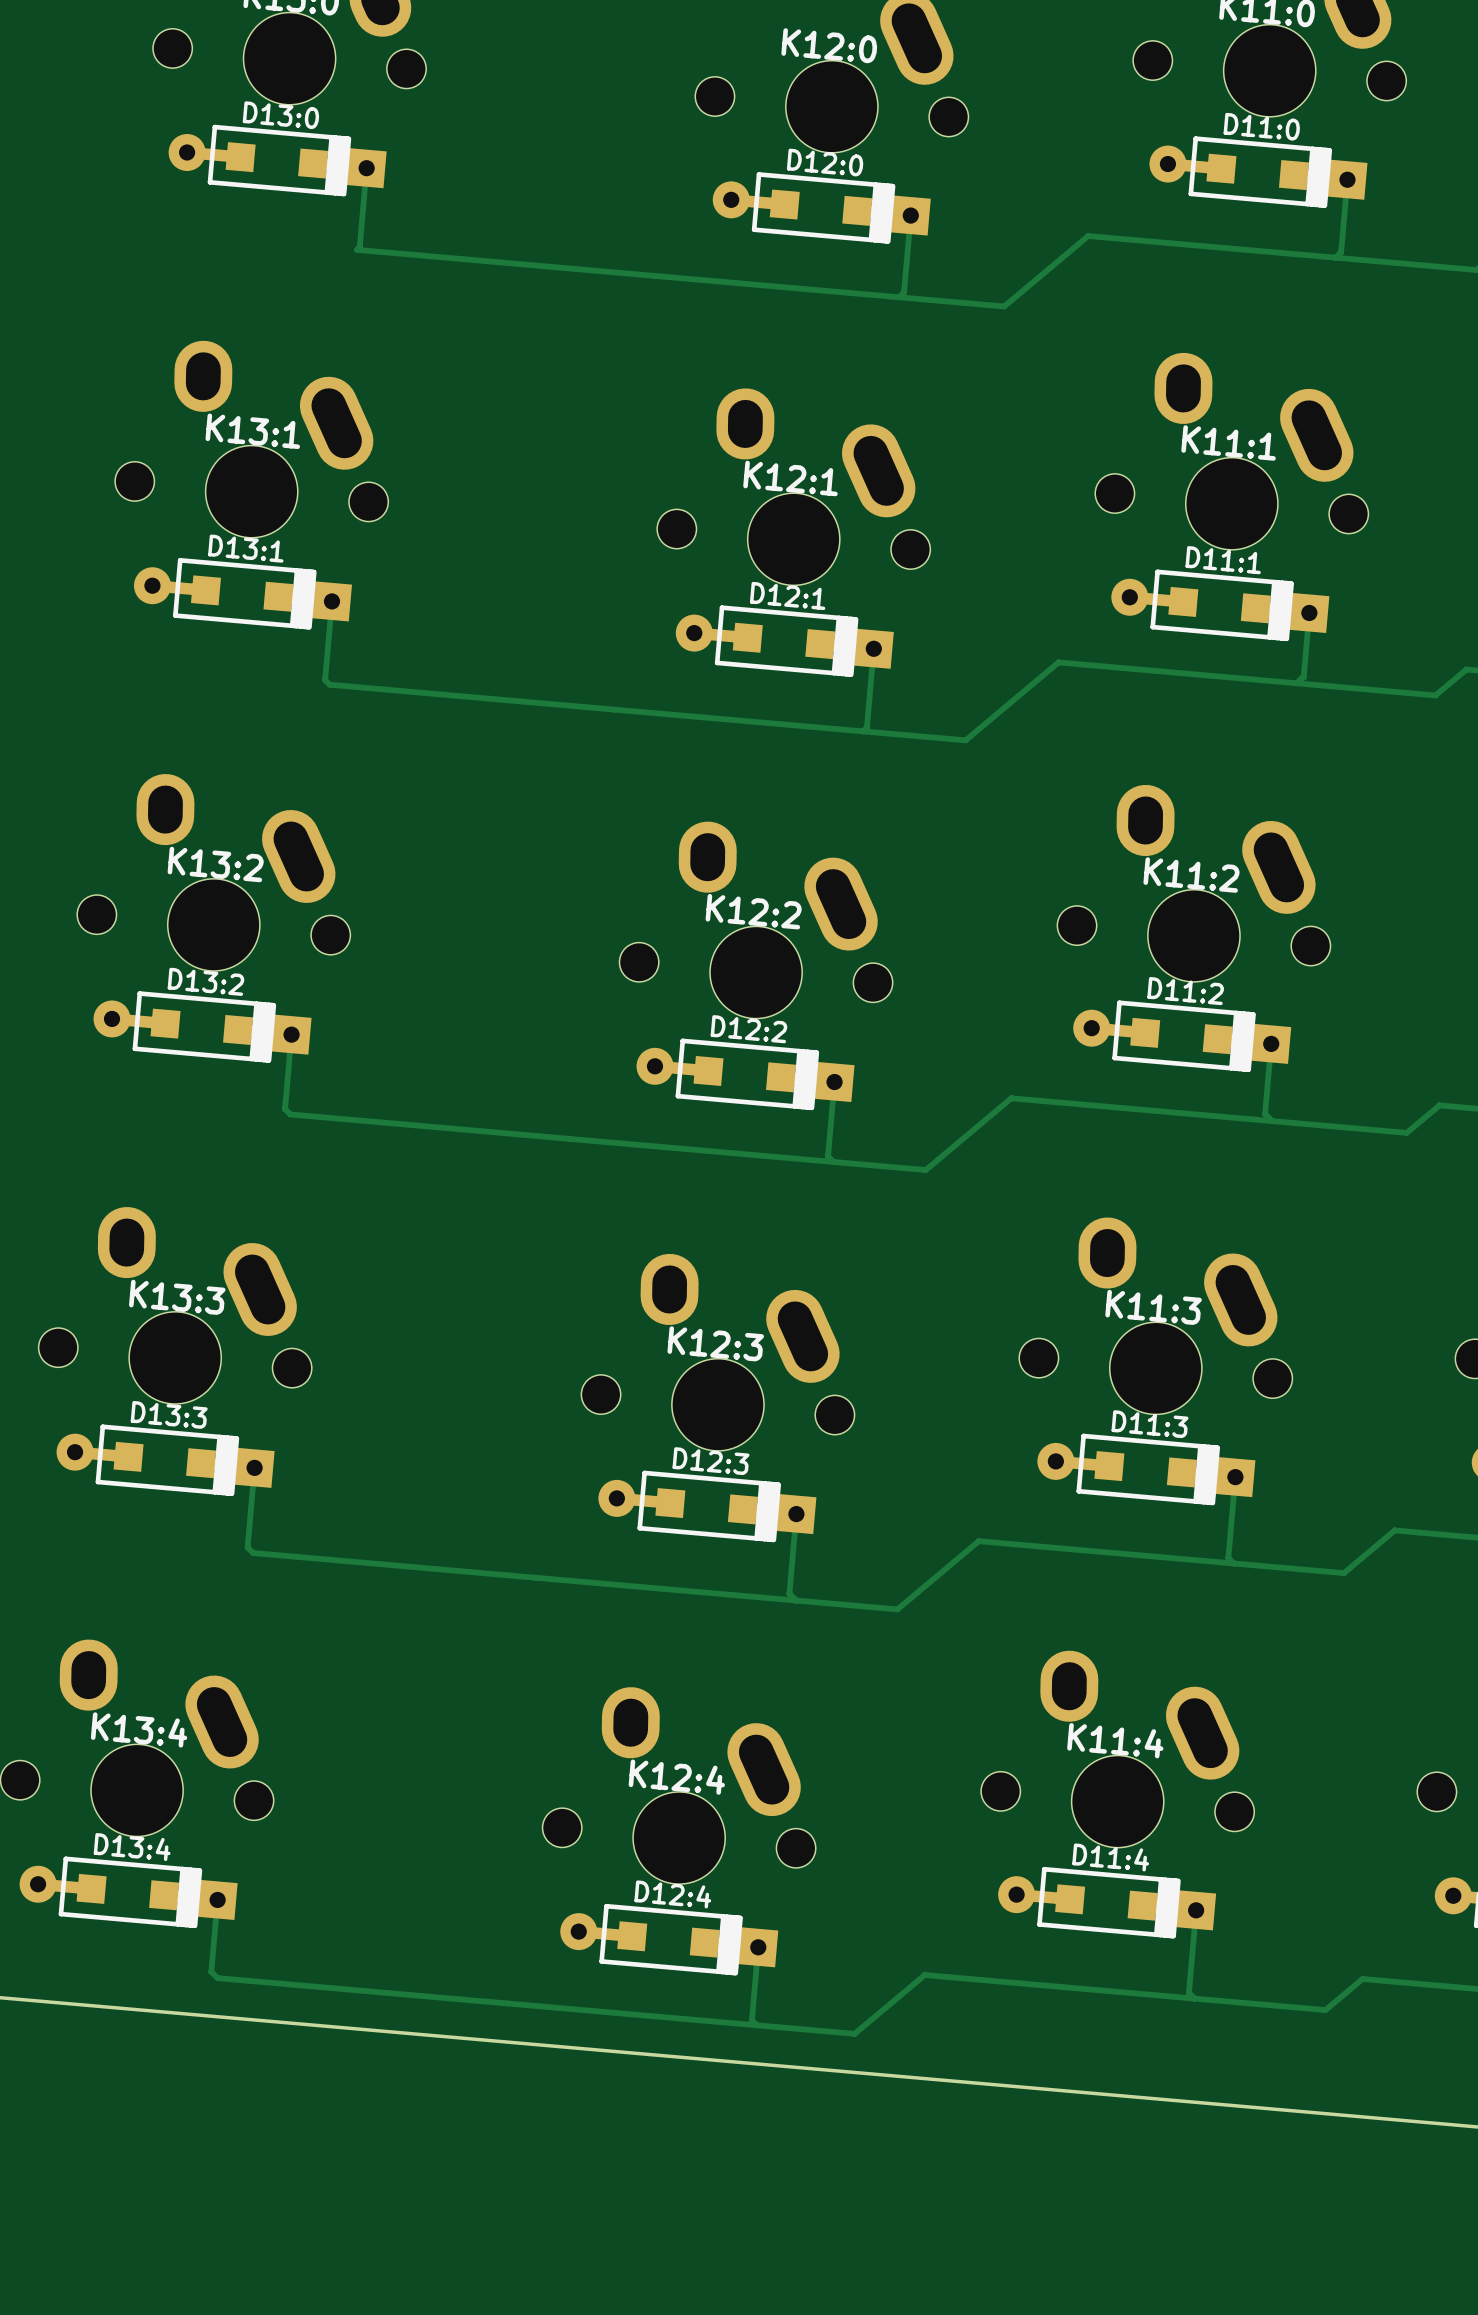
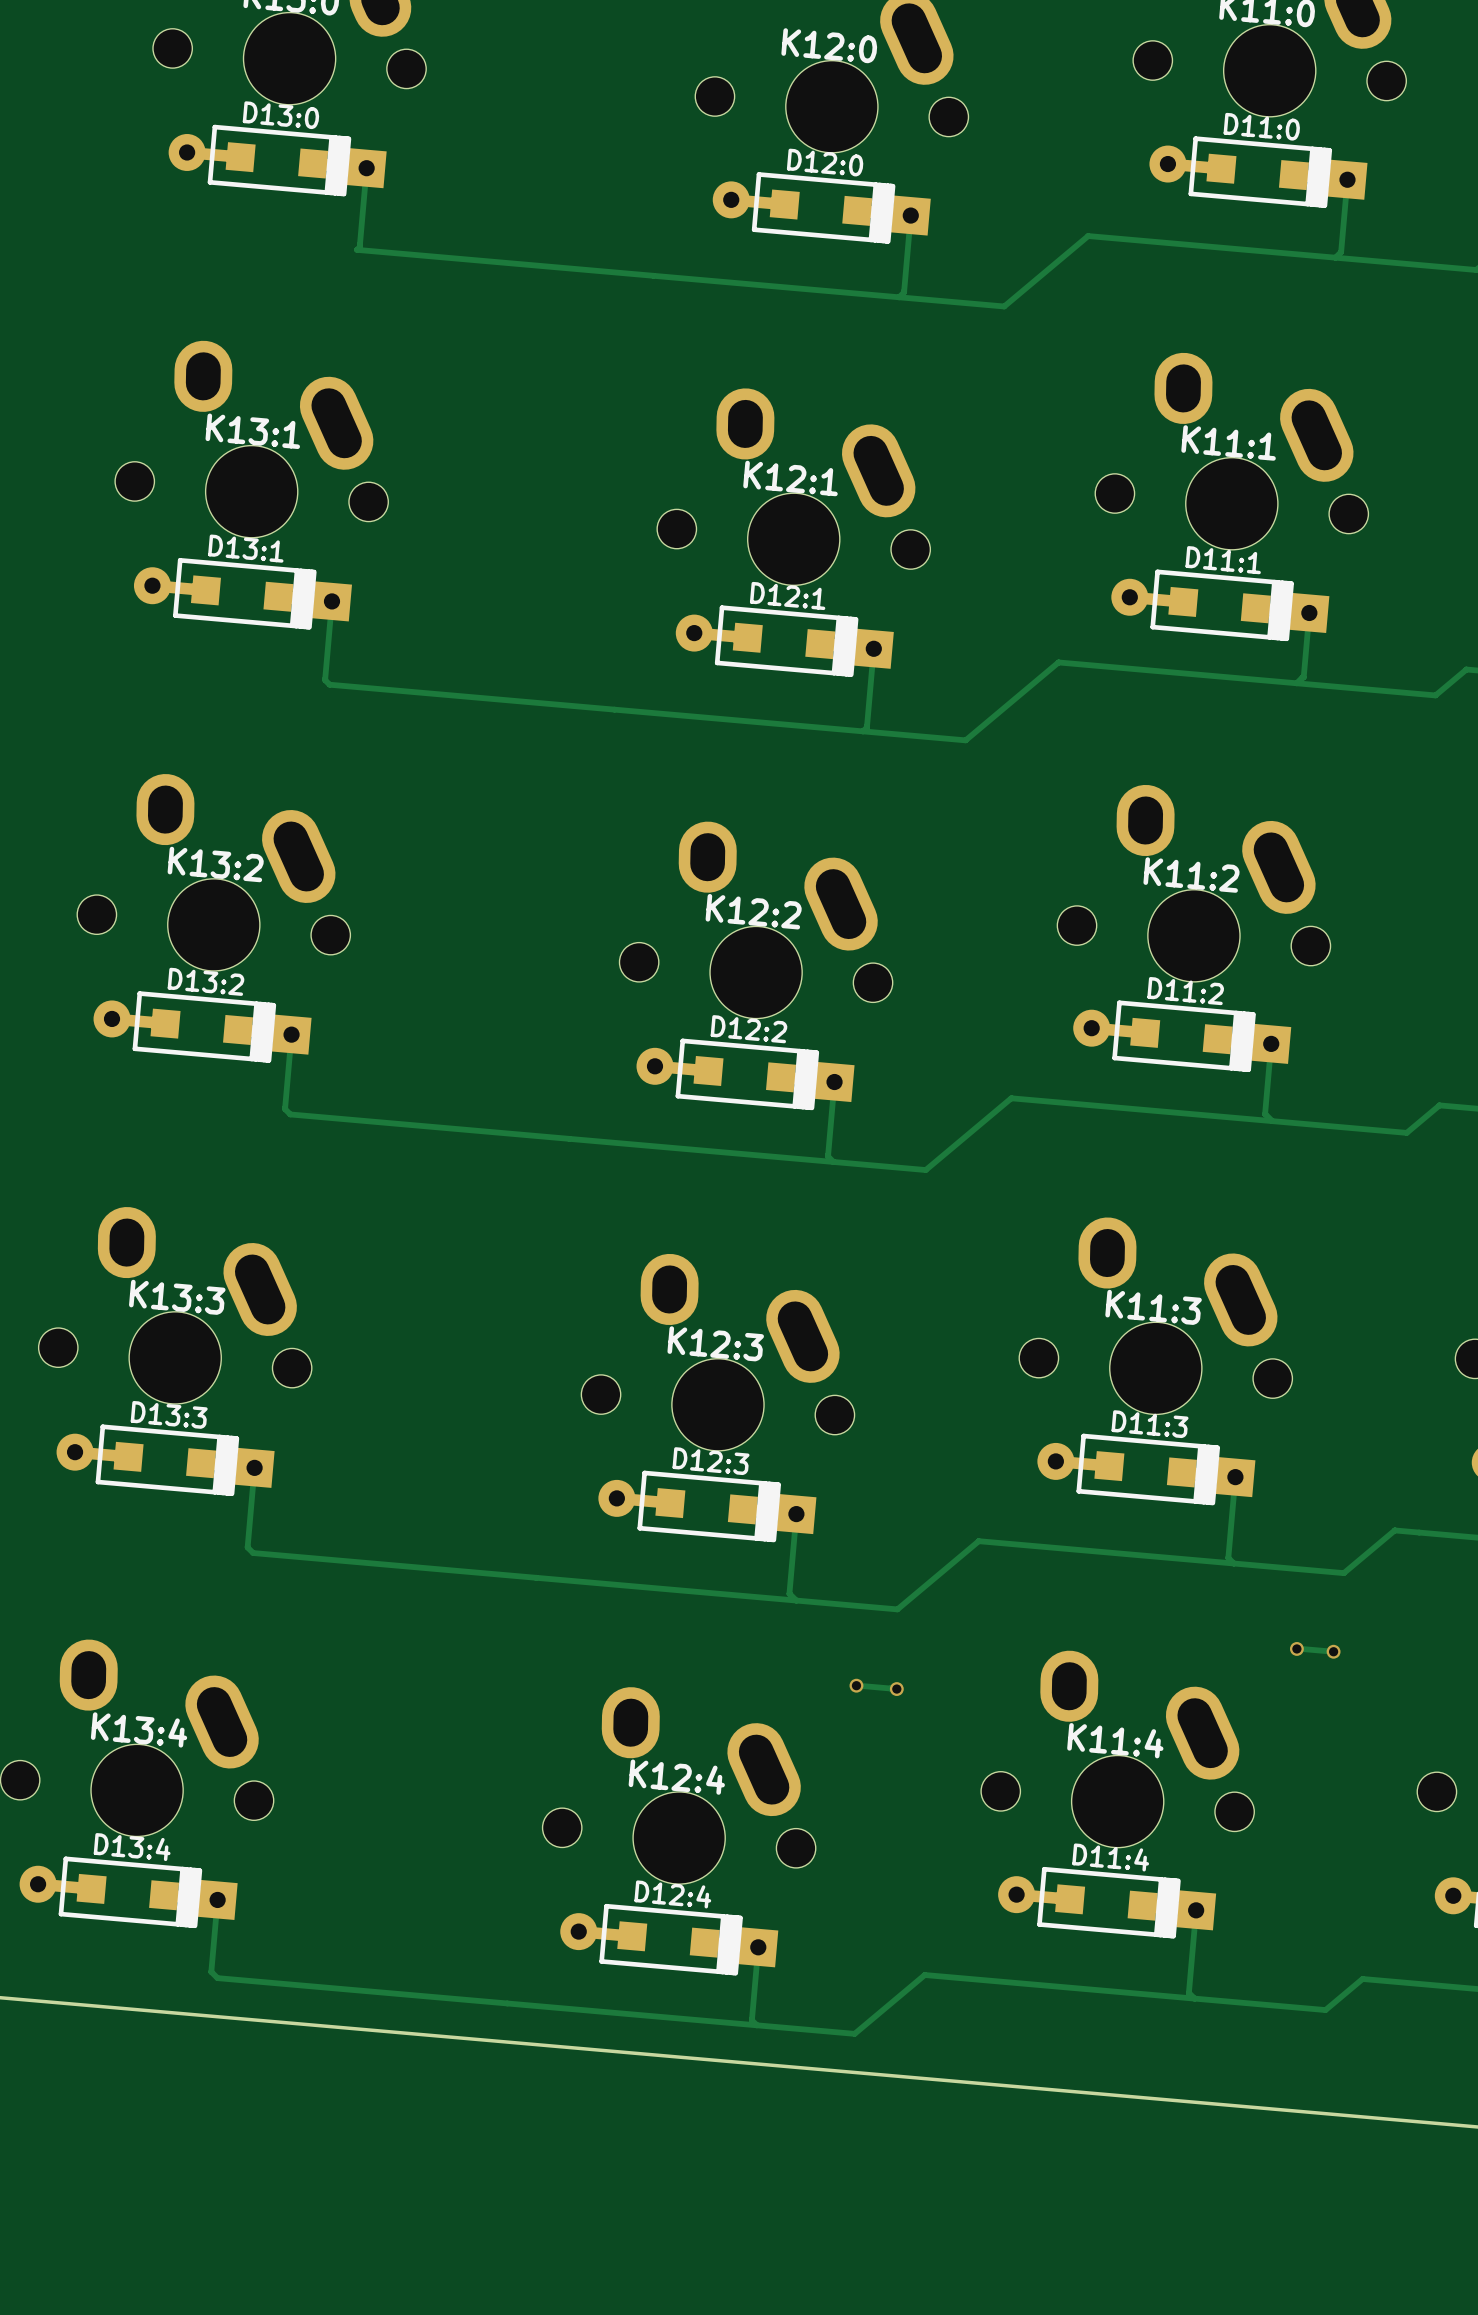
track: none -> (1296, 1648) (1333, 1651)
via: none -> (1296, 1648)
via: none -> (1333, 1651)
track: none -> (856, 1685) (896, 1689)
via: none -> (856, 1685)
via: none -> (896, 1689)

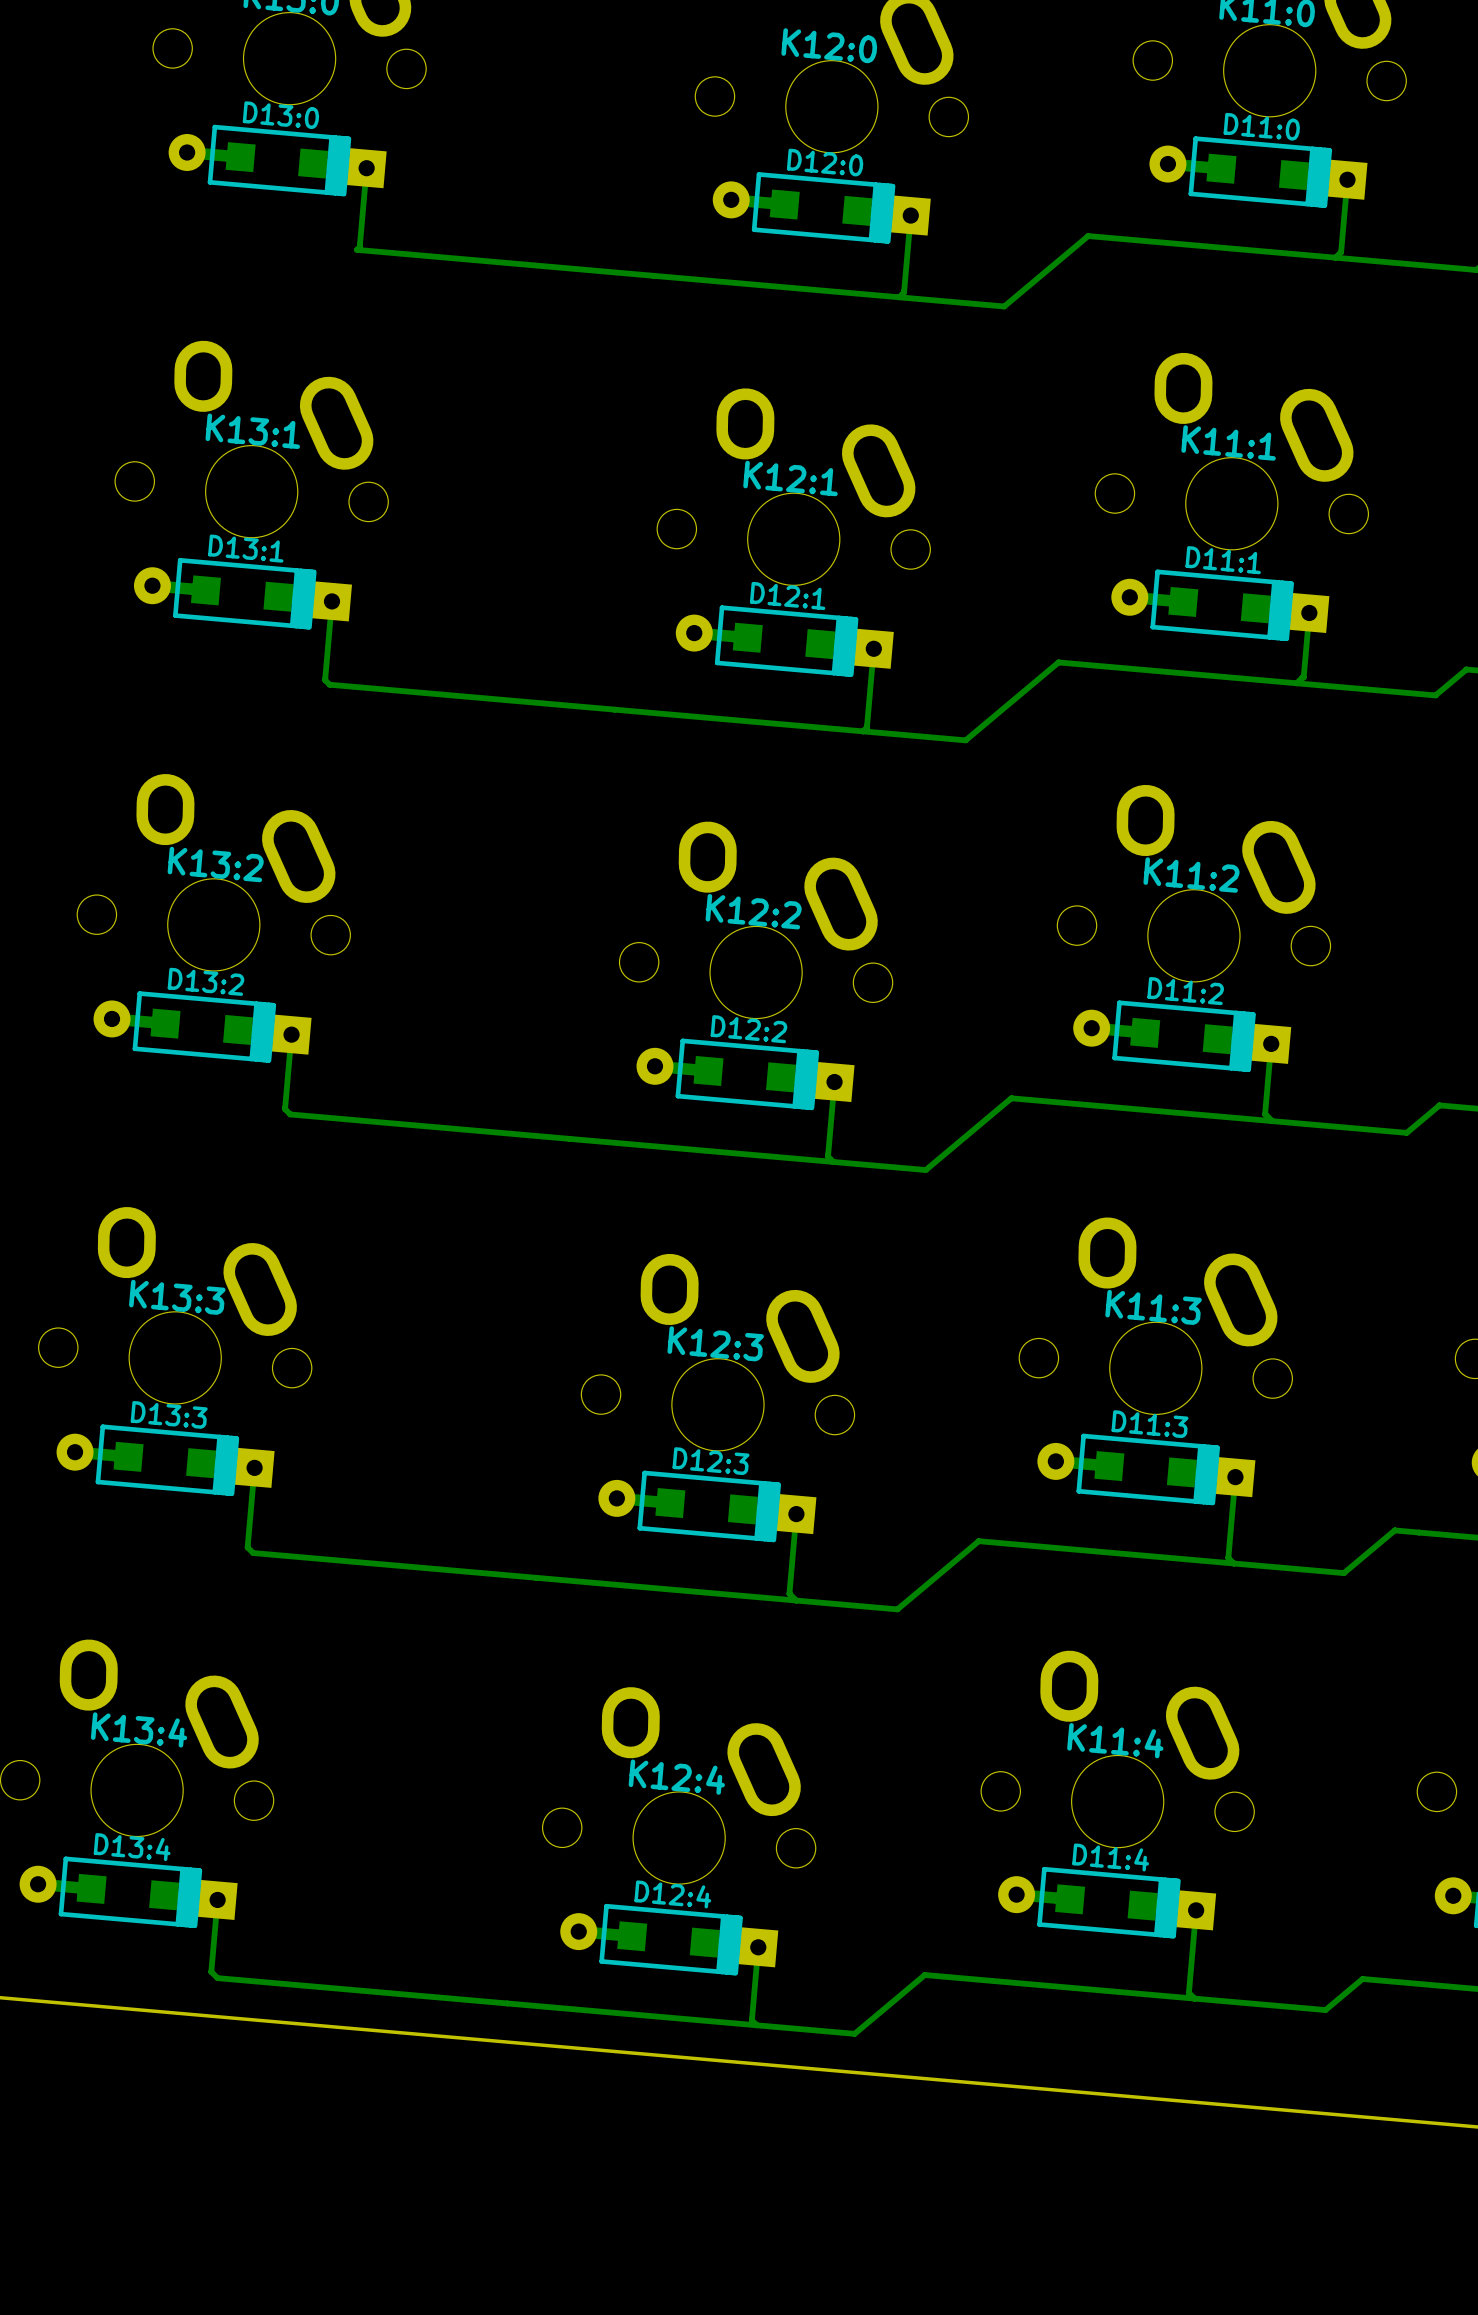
track: (1296, 1648) (1333, 1651) -> none
via: (1296, 1648) -> none
via: (1333, 1651) -> none
track: (856, 1685) (896, 1689) -> none
via: (856, 1685) -> none
via: (896, 1689) -> none

